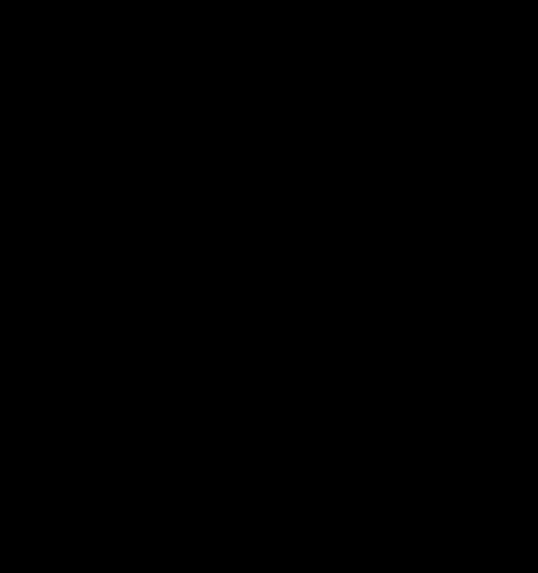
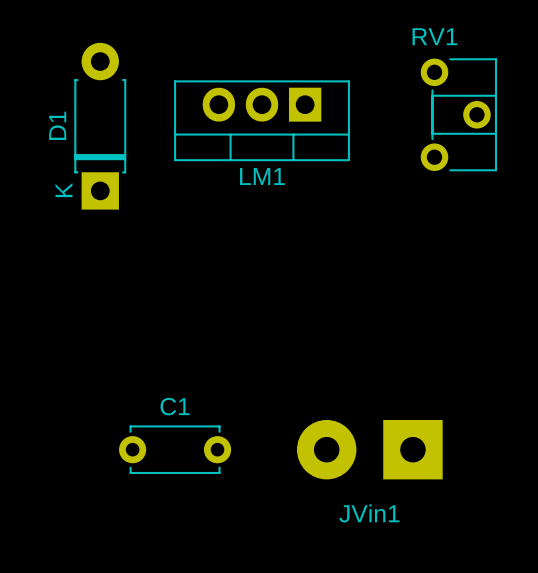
RV1: none -> (458, 114)
LM1: none -> (262, 120)
D1: none -> (100, 126)
C1: none -> (175, 449)
JVin1: none -> (369, 449)

